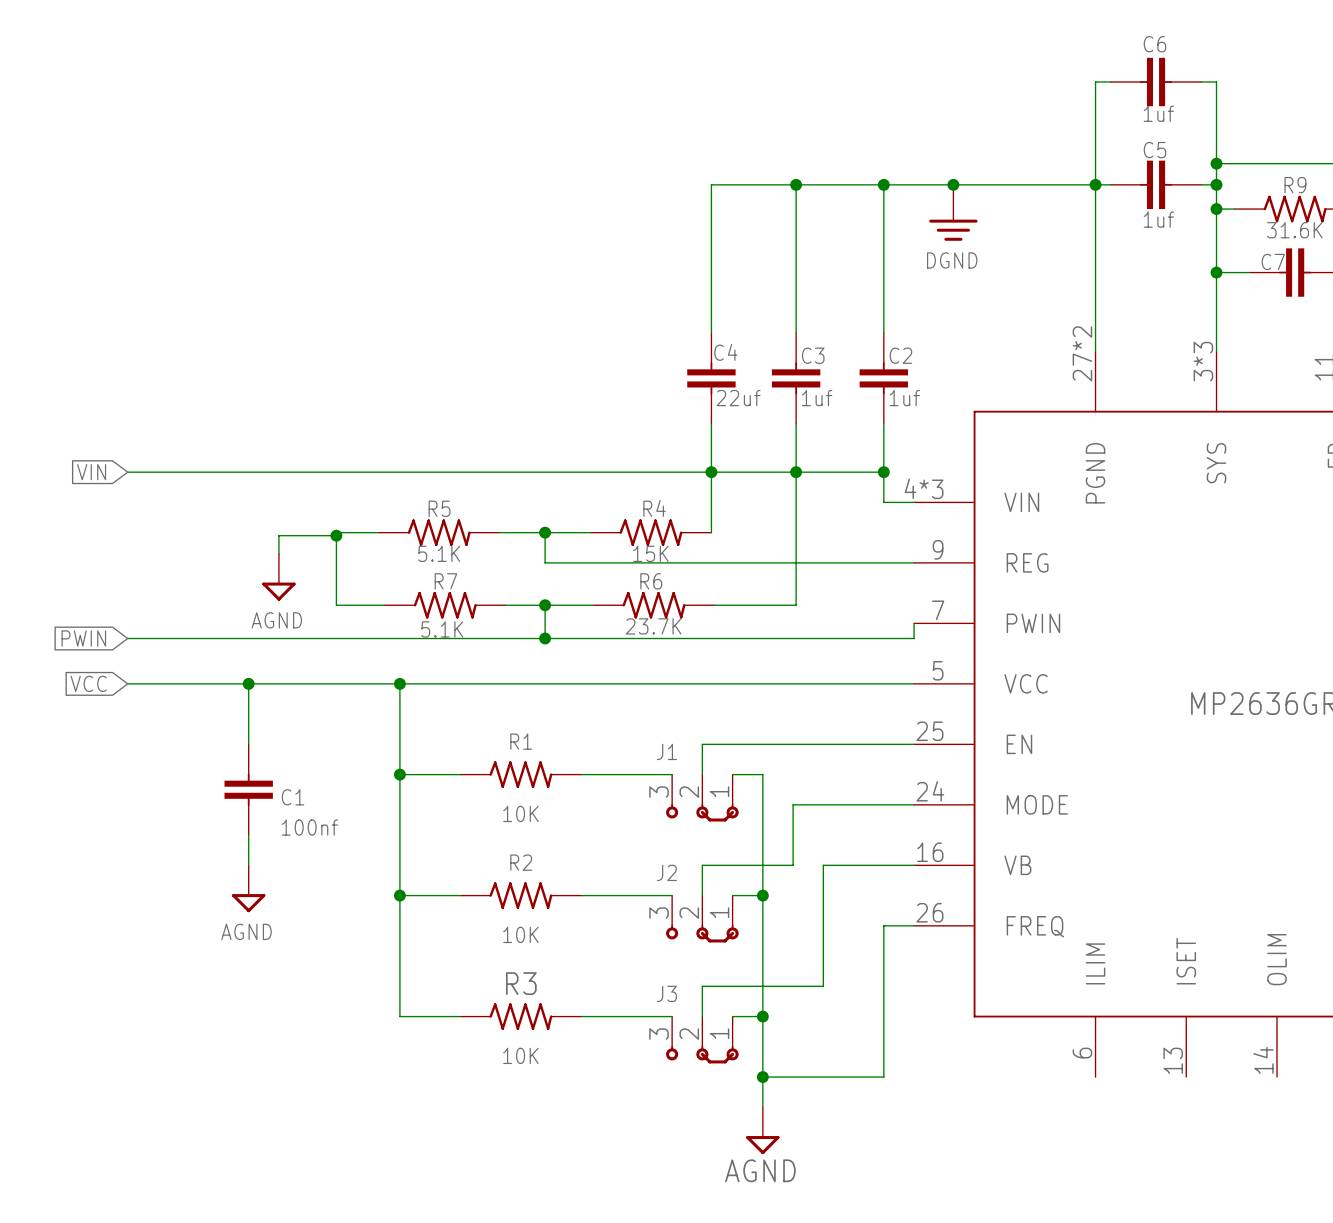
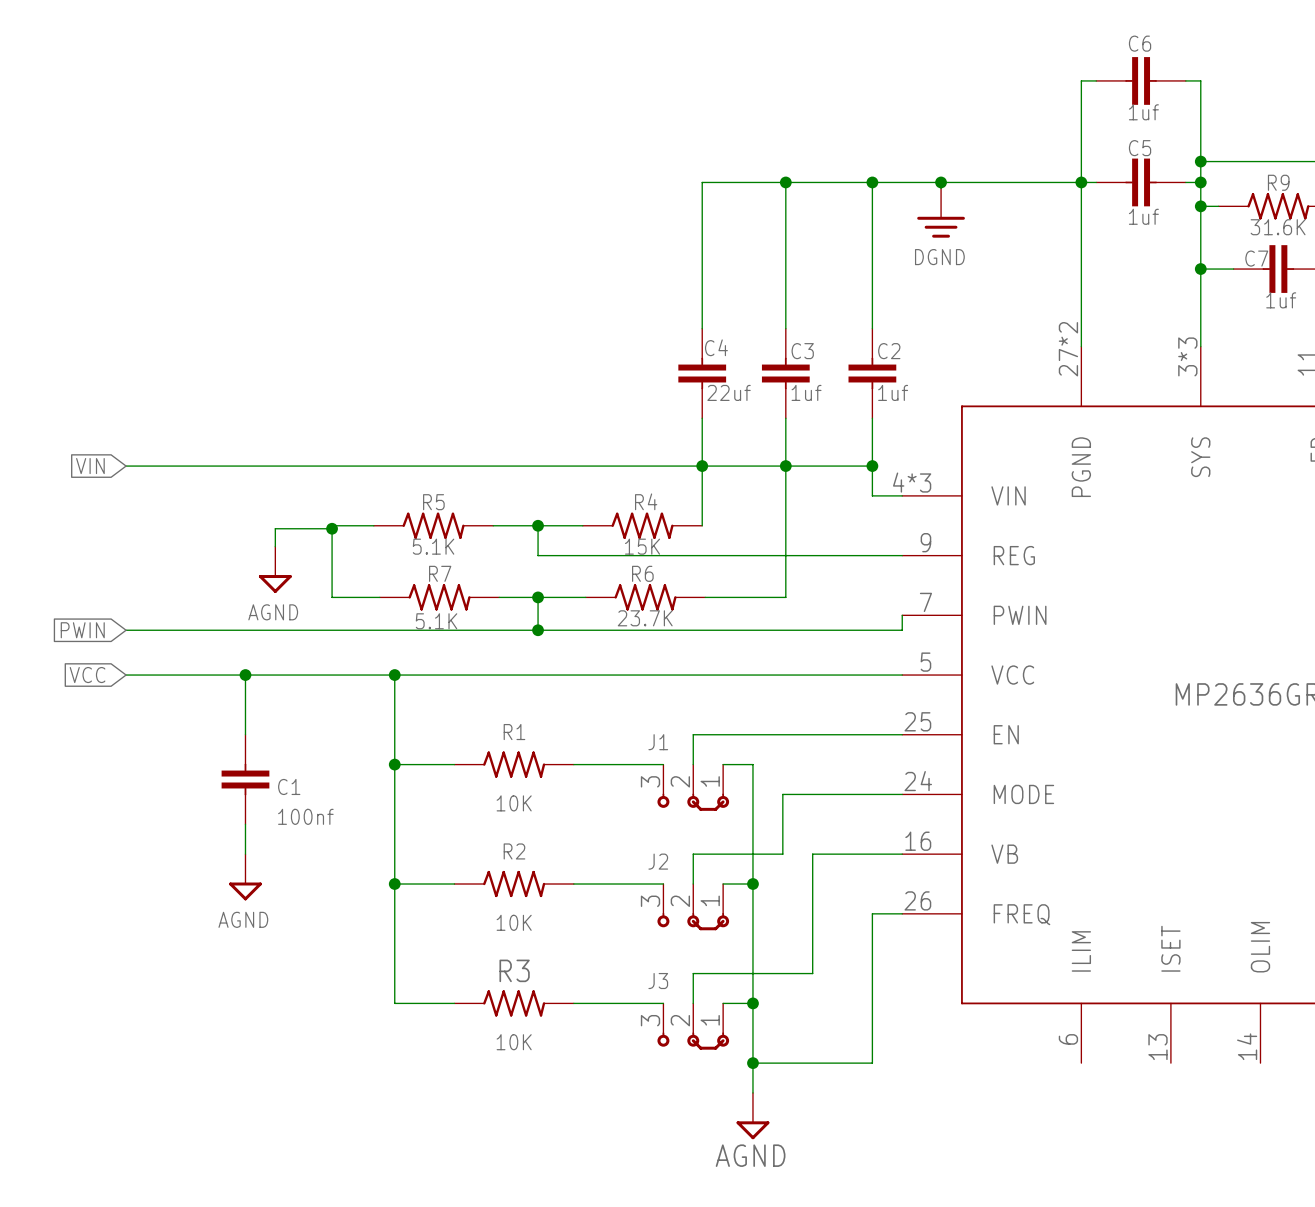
C7 value: none -> 1uf (1281, 300)

